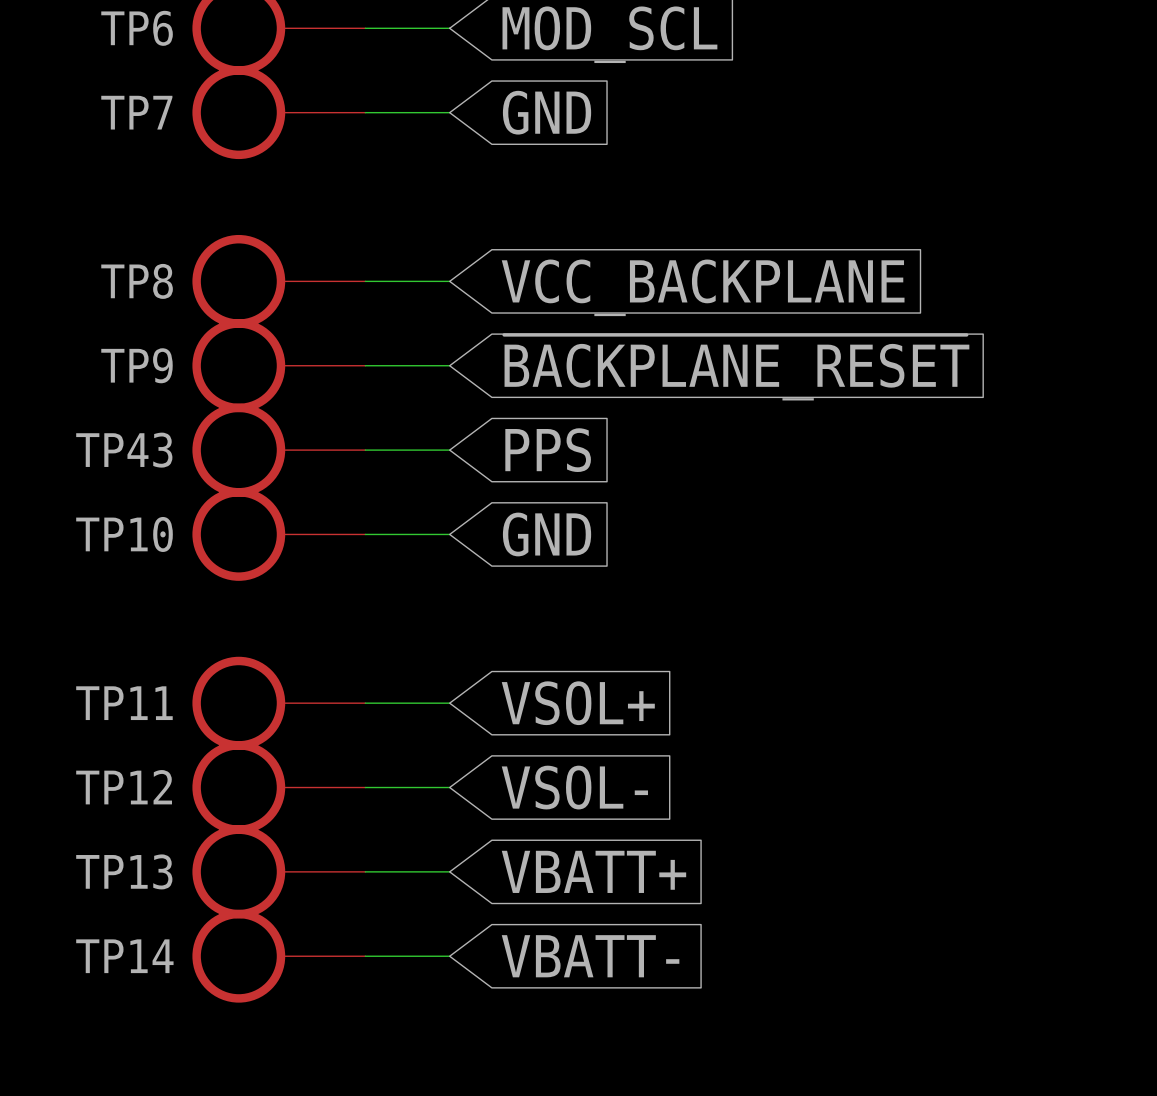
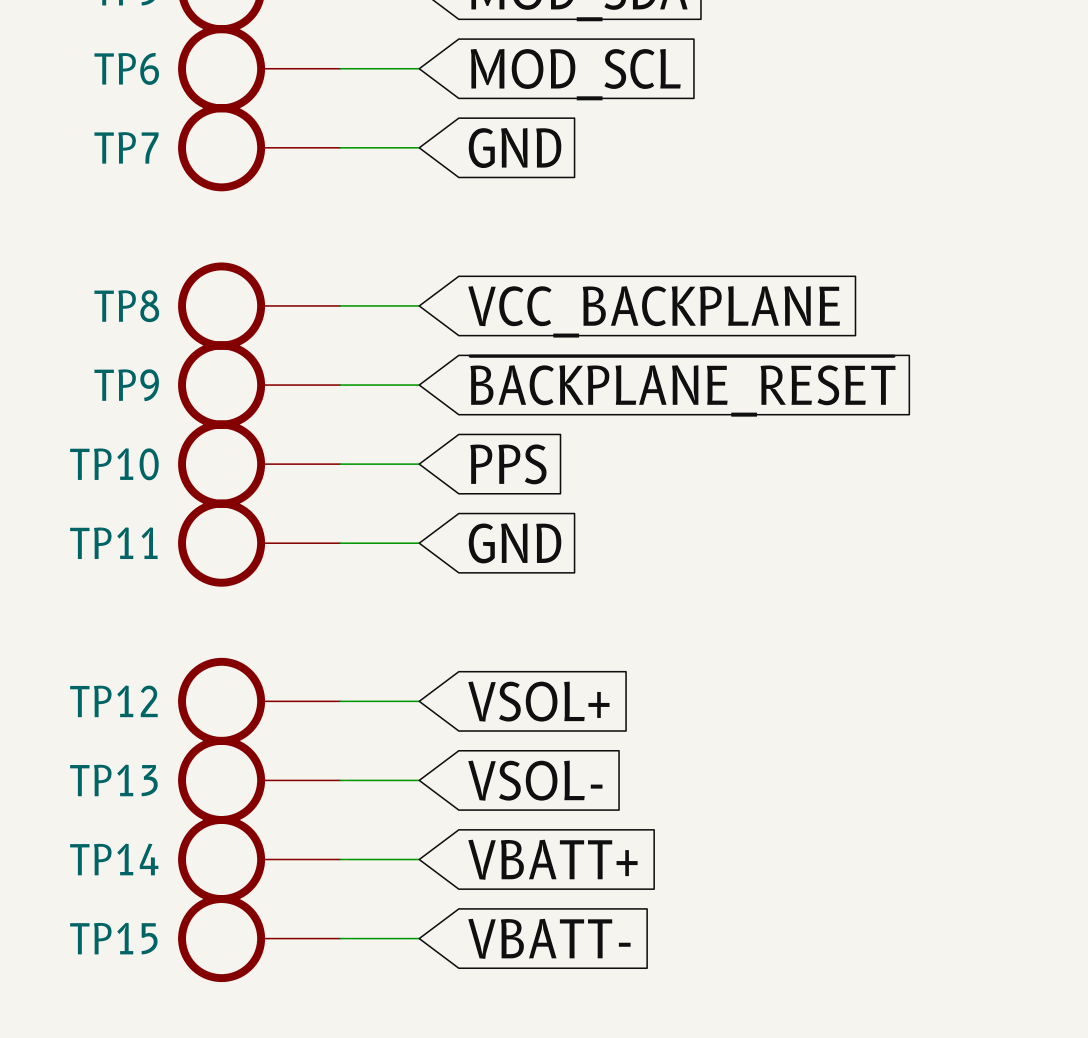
TP43 name: TP43 (124, 450) -> TP10 (114, 464)
TP10 name: TP10 (124, 534) -> TP11 (113, 543)
TP11 name: TP11 (124, 703) -> TP12 (113, 701)
TP12 name: TP12 (124, 787) -> TP13 (113, 780)
TP13 name: TP13 (124, 871) -> TP14 (114, 859)
TP14 name: TP14 (124, 956) -> TP15 (113, 938)

